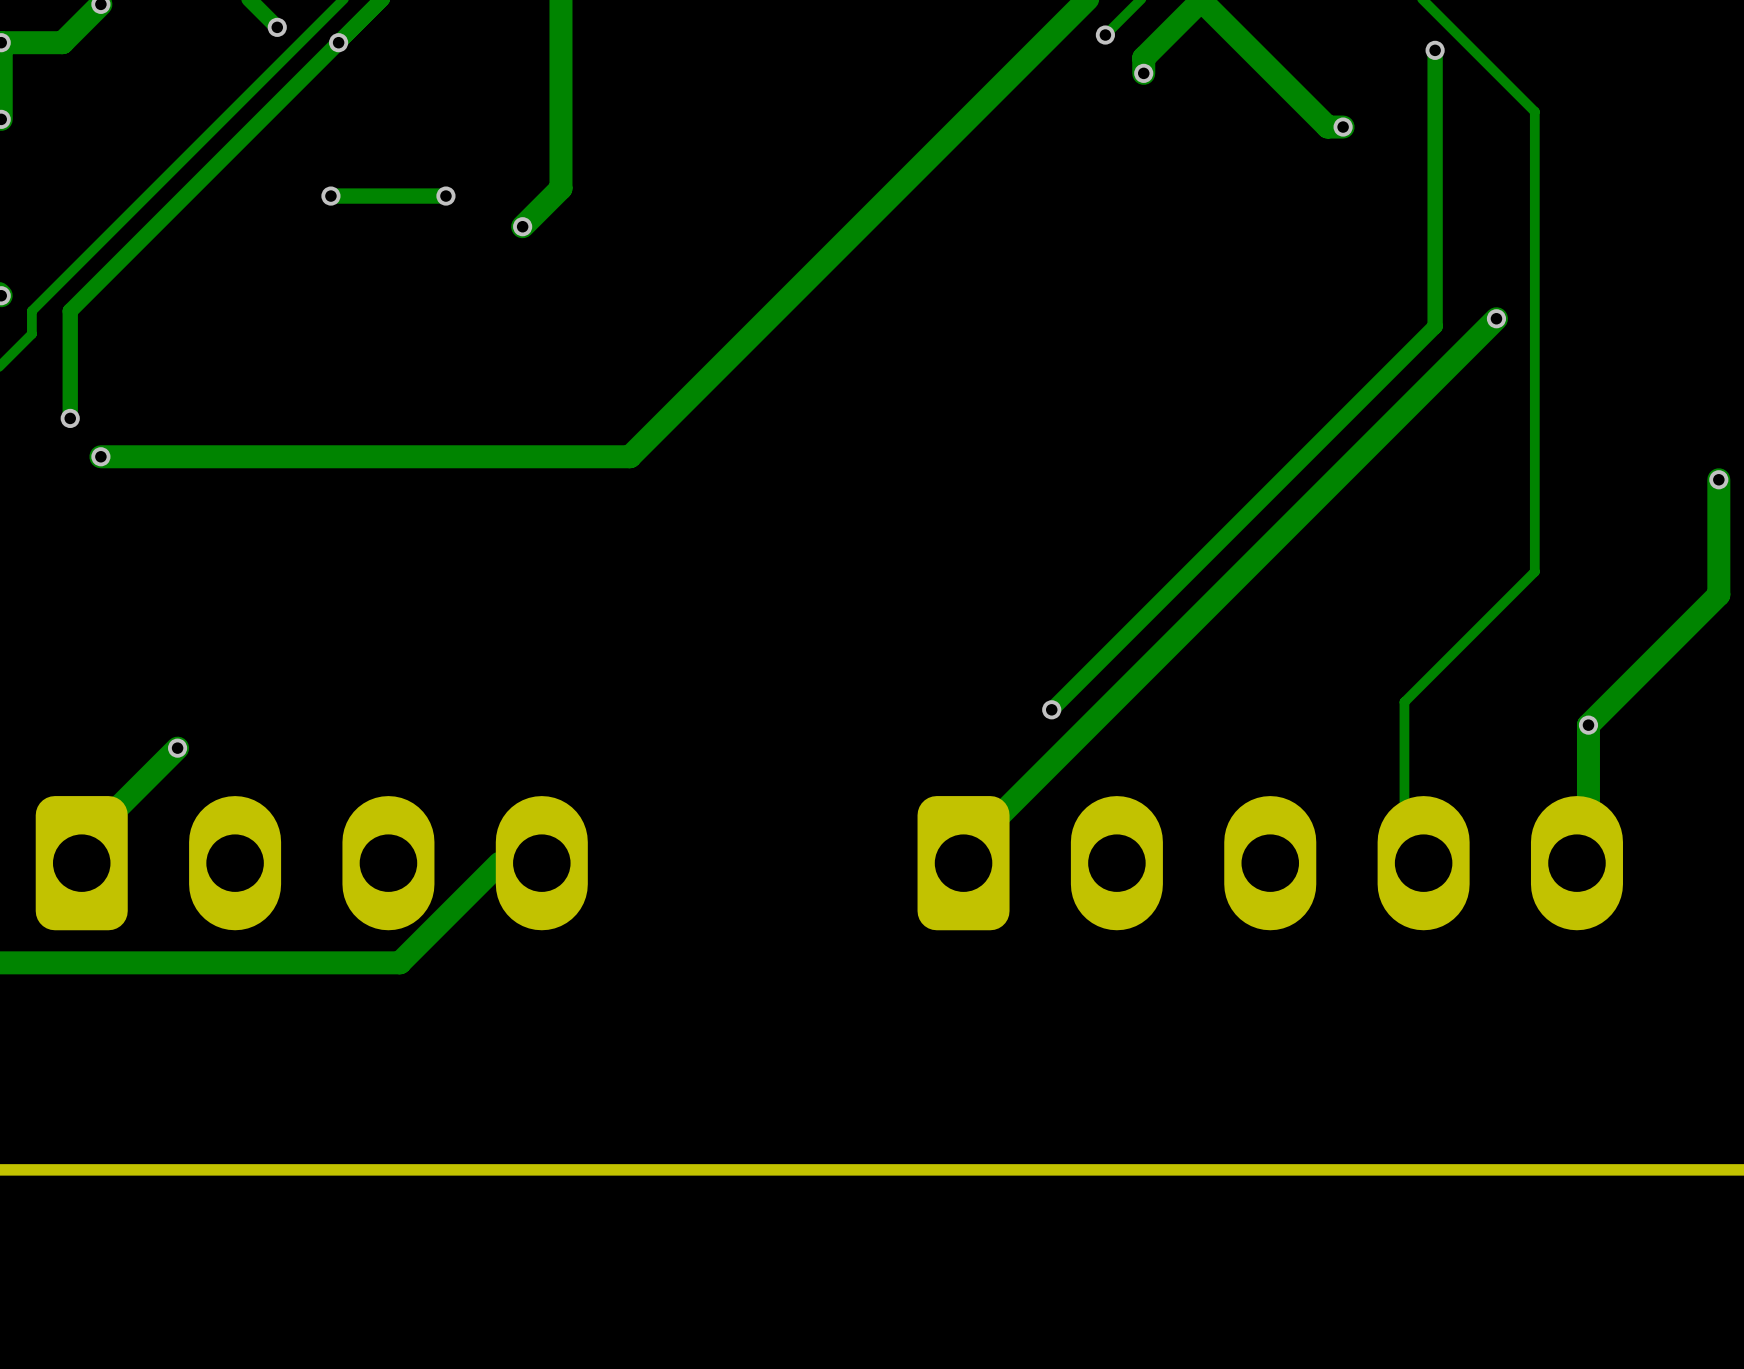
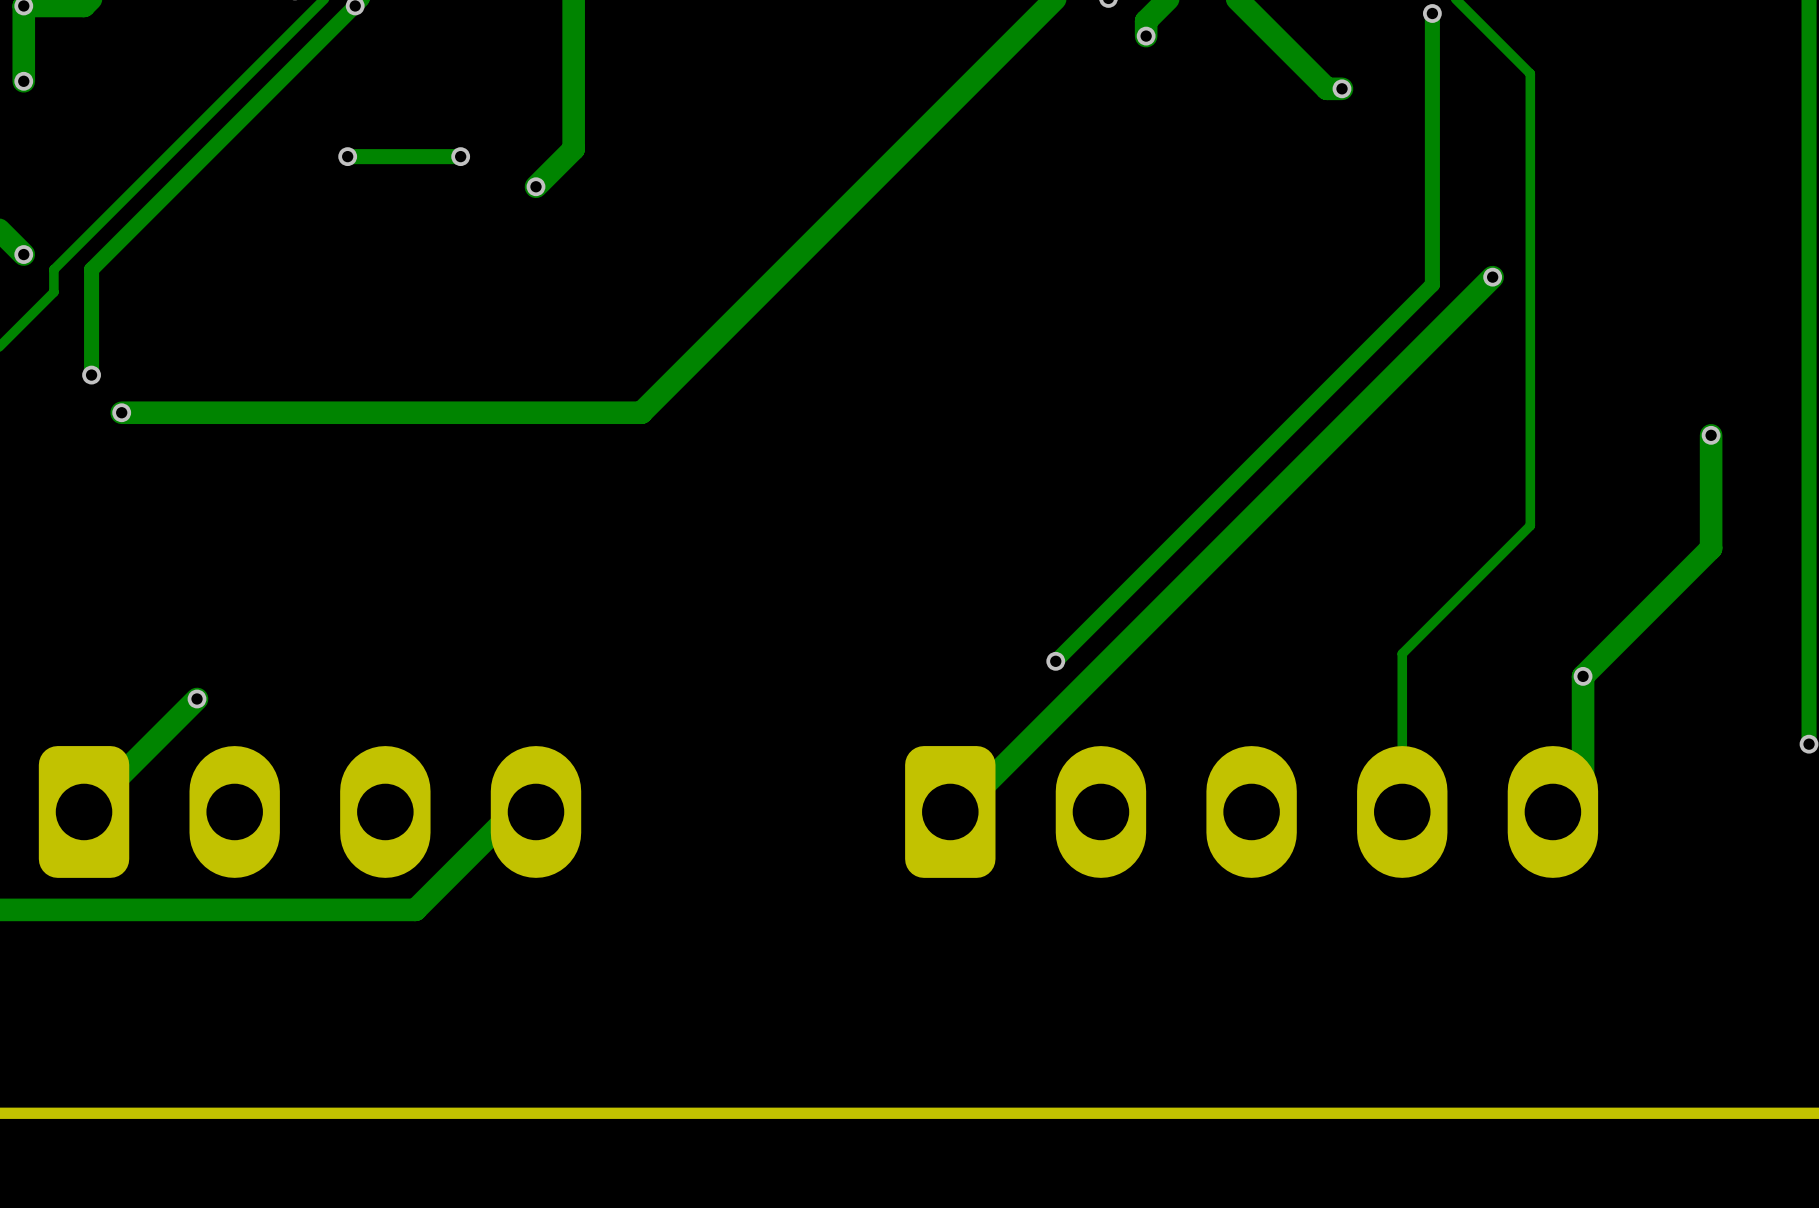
part position: (311, 863) -> (310, 811)
part position: (1270, 863) -> (1251, 811)

